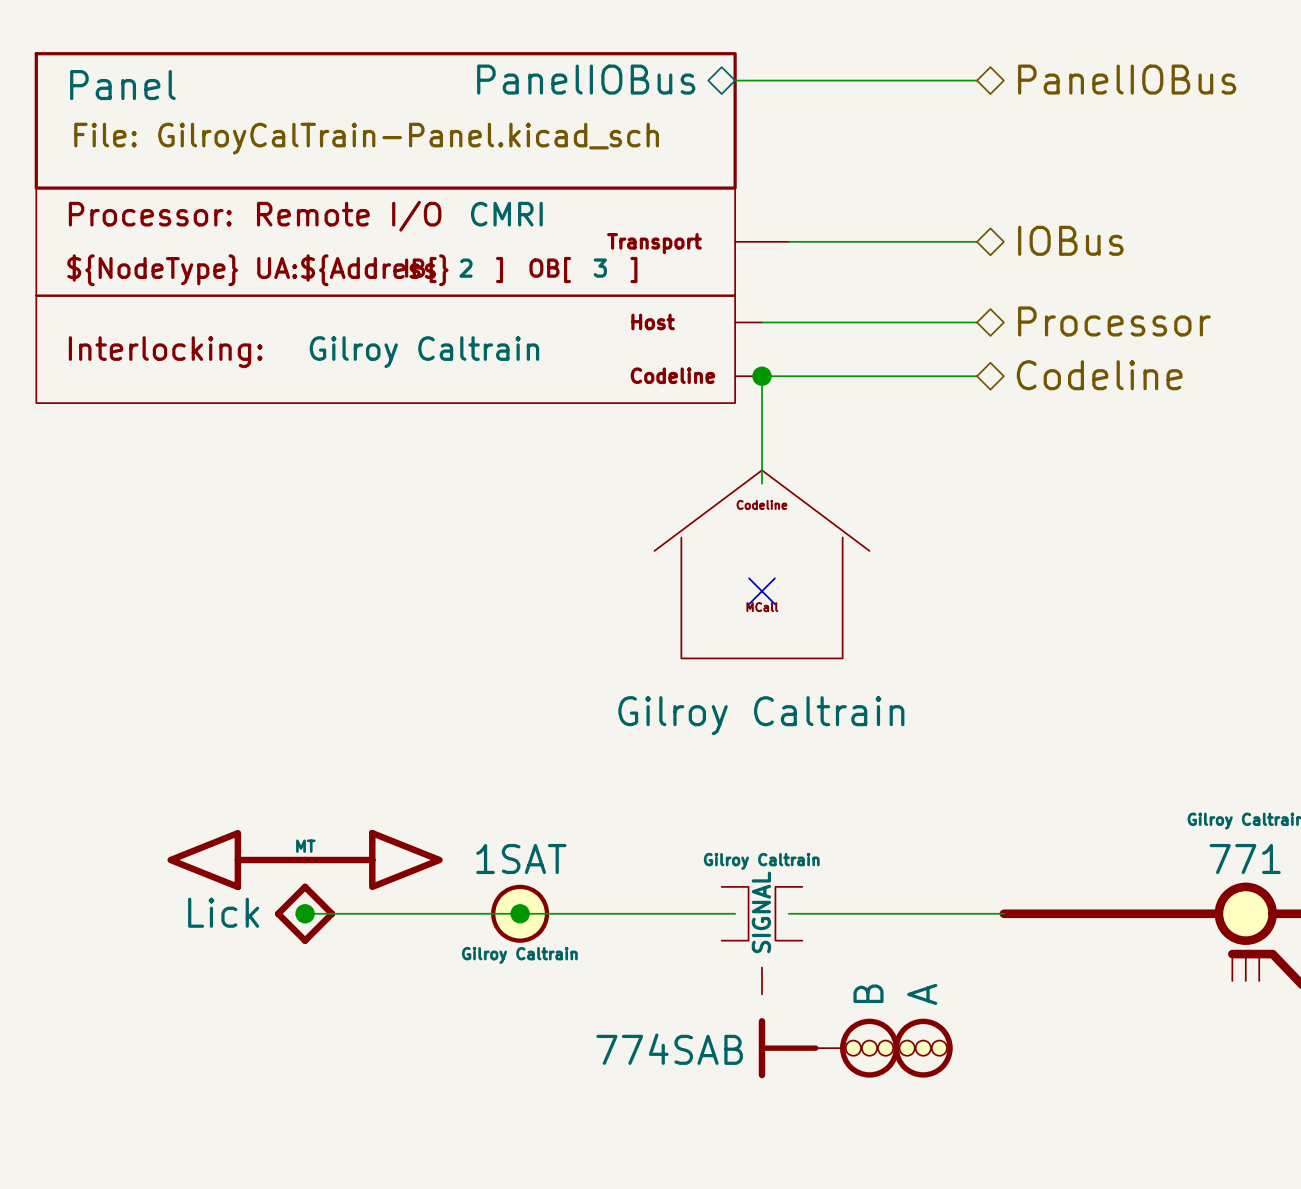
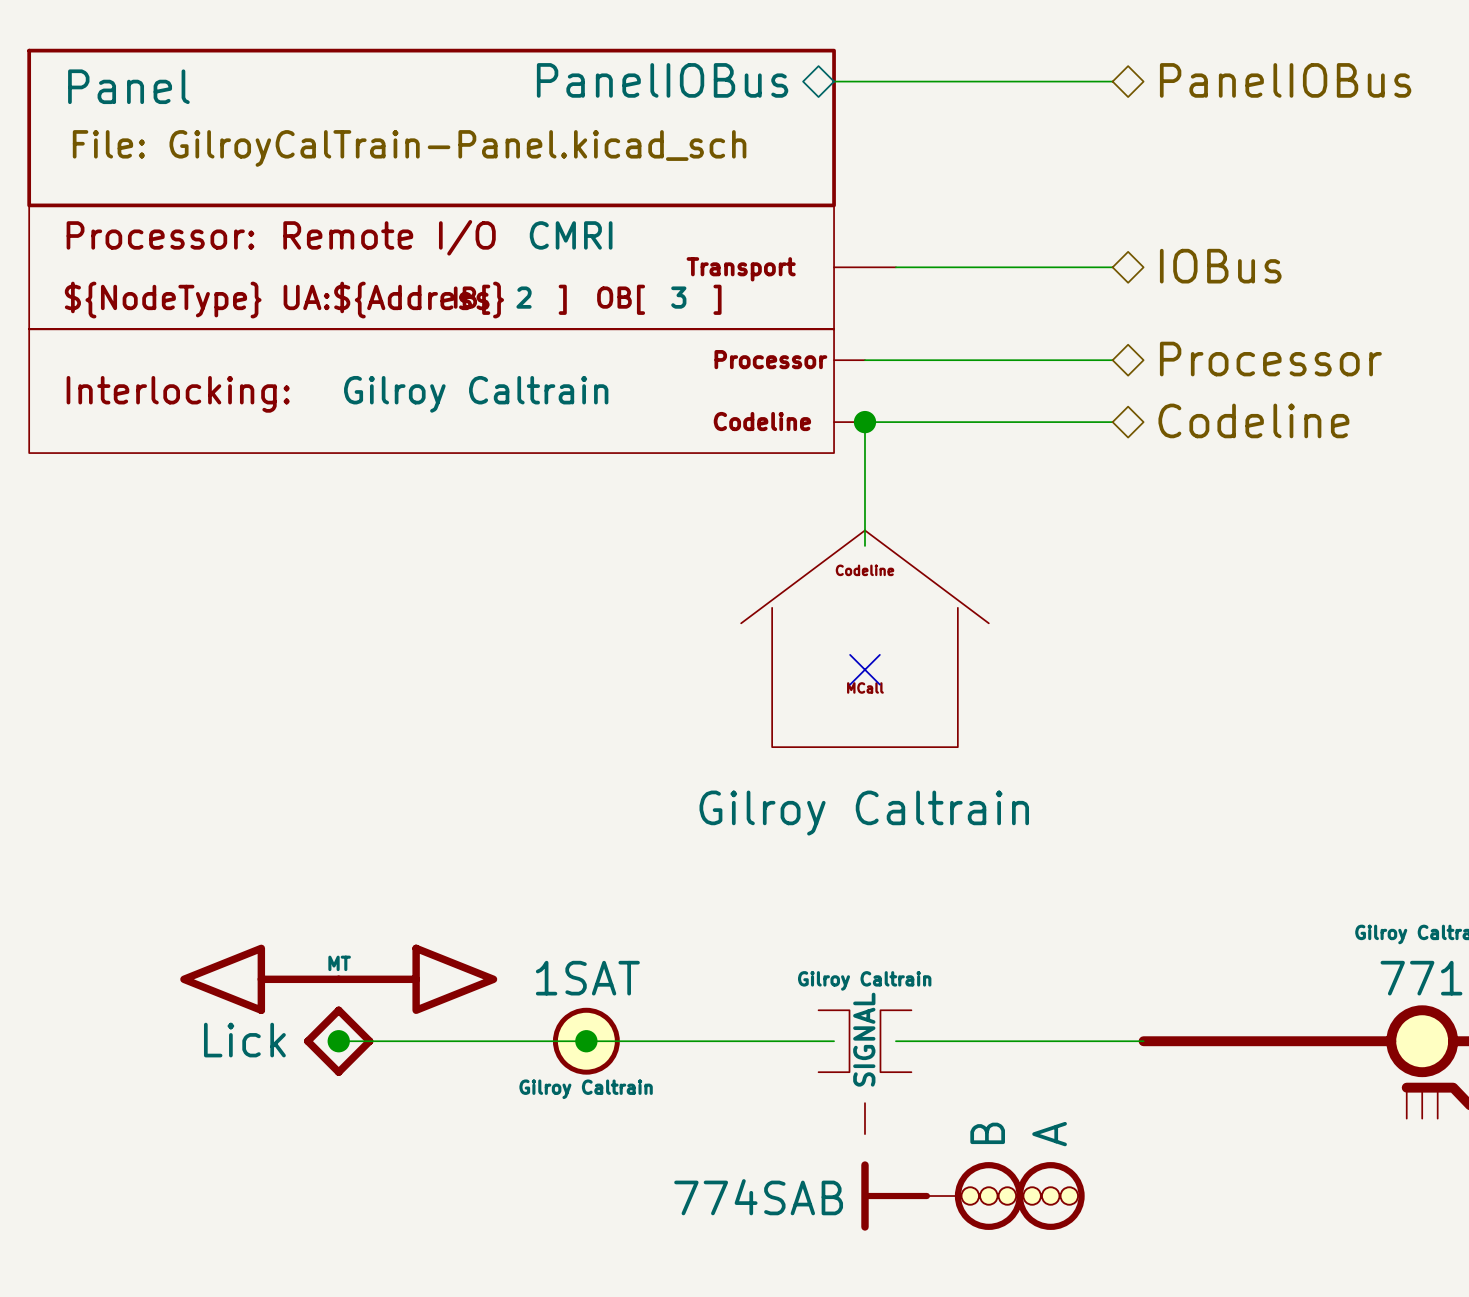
part text: Host (653, 321) -> Processor (770, 359)

